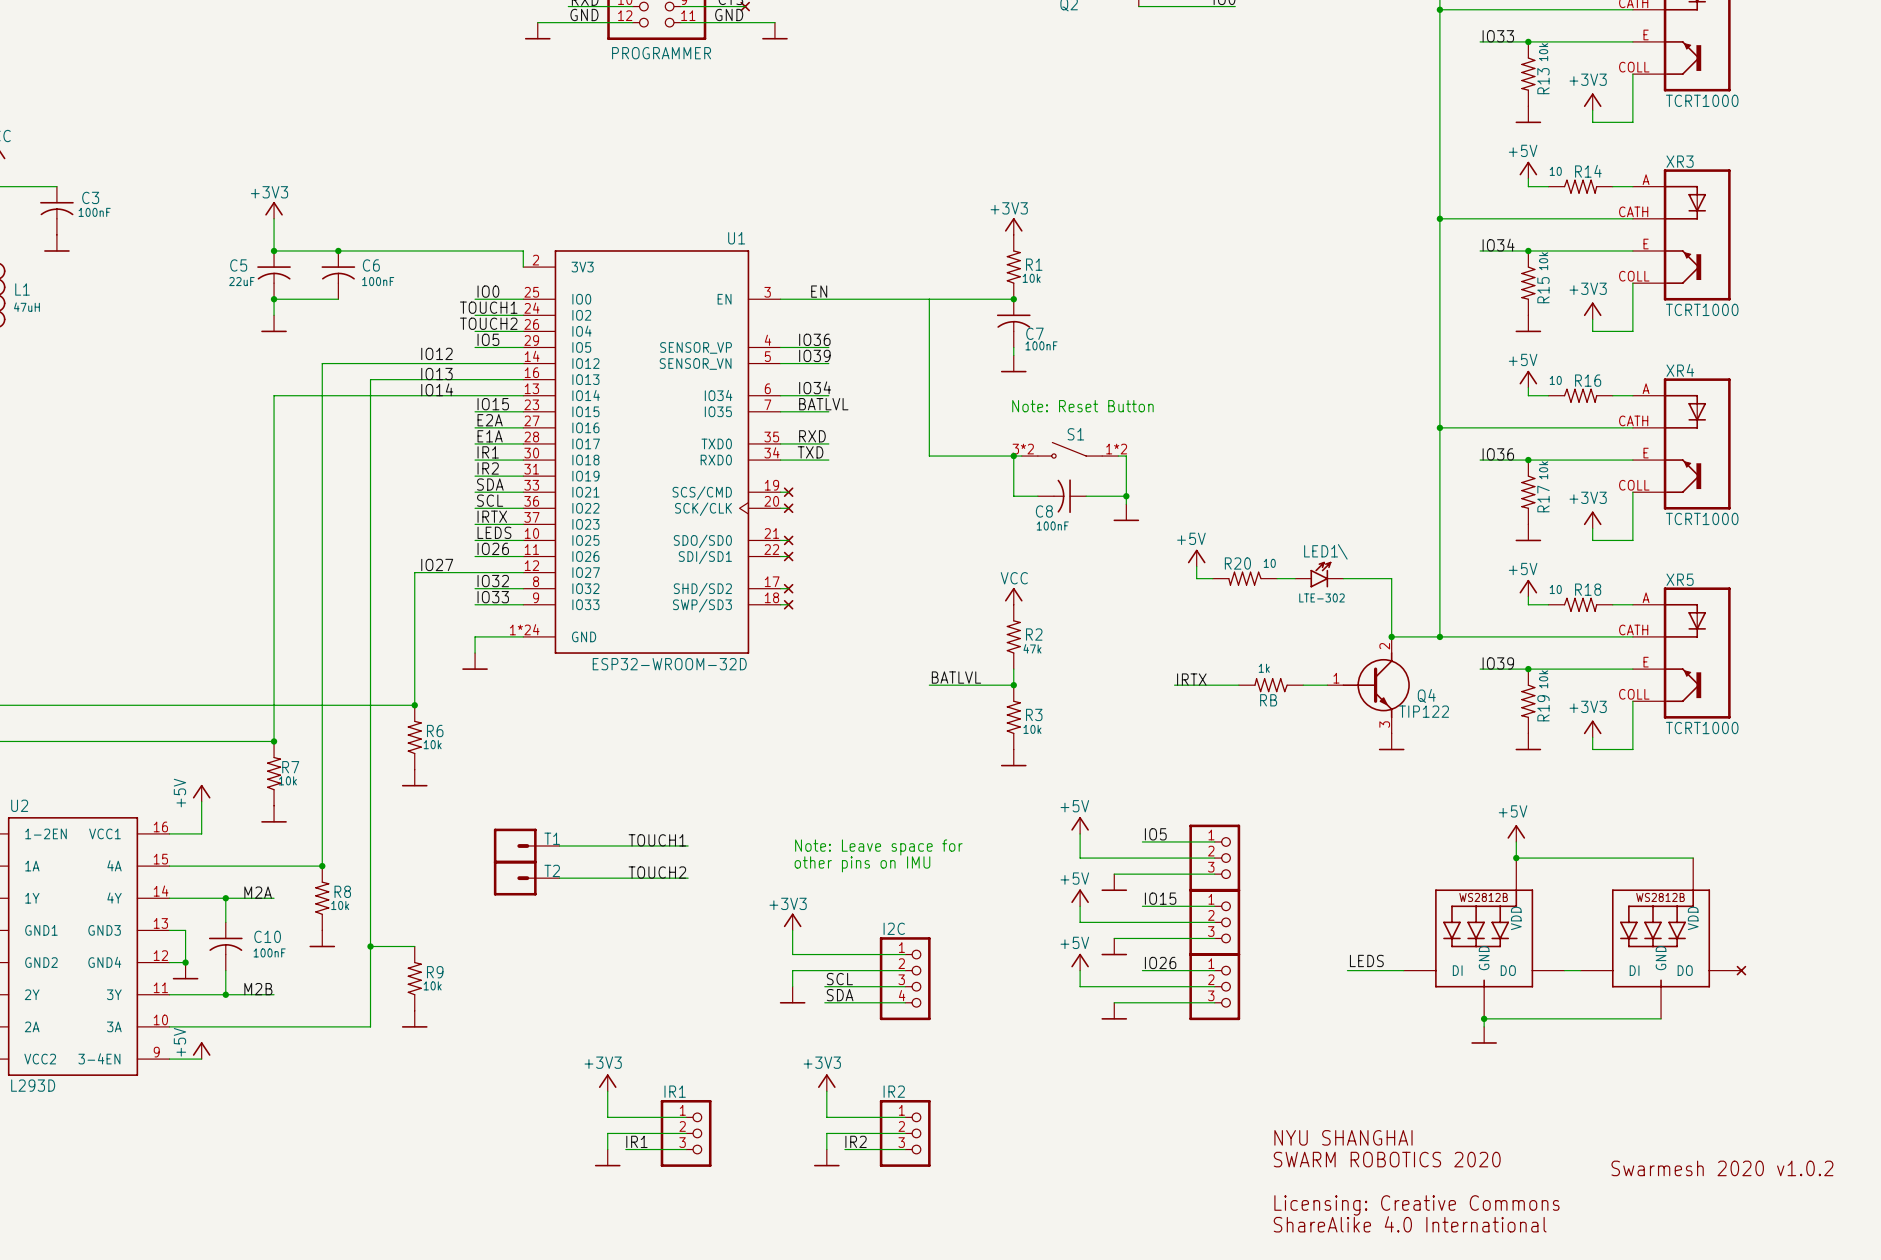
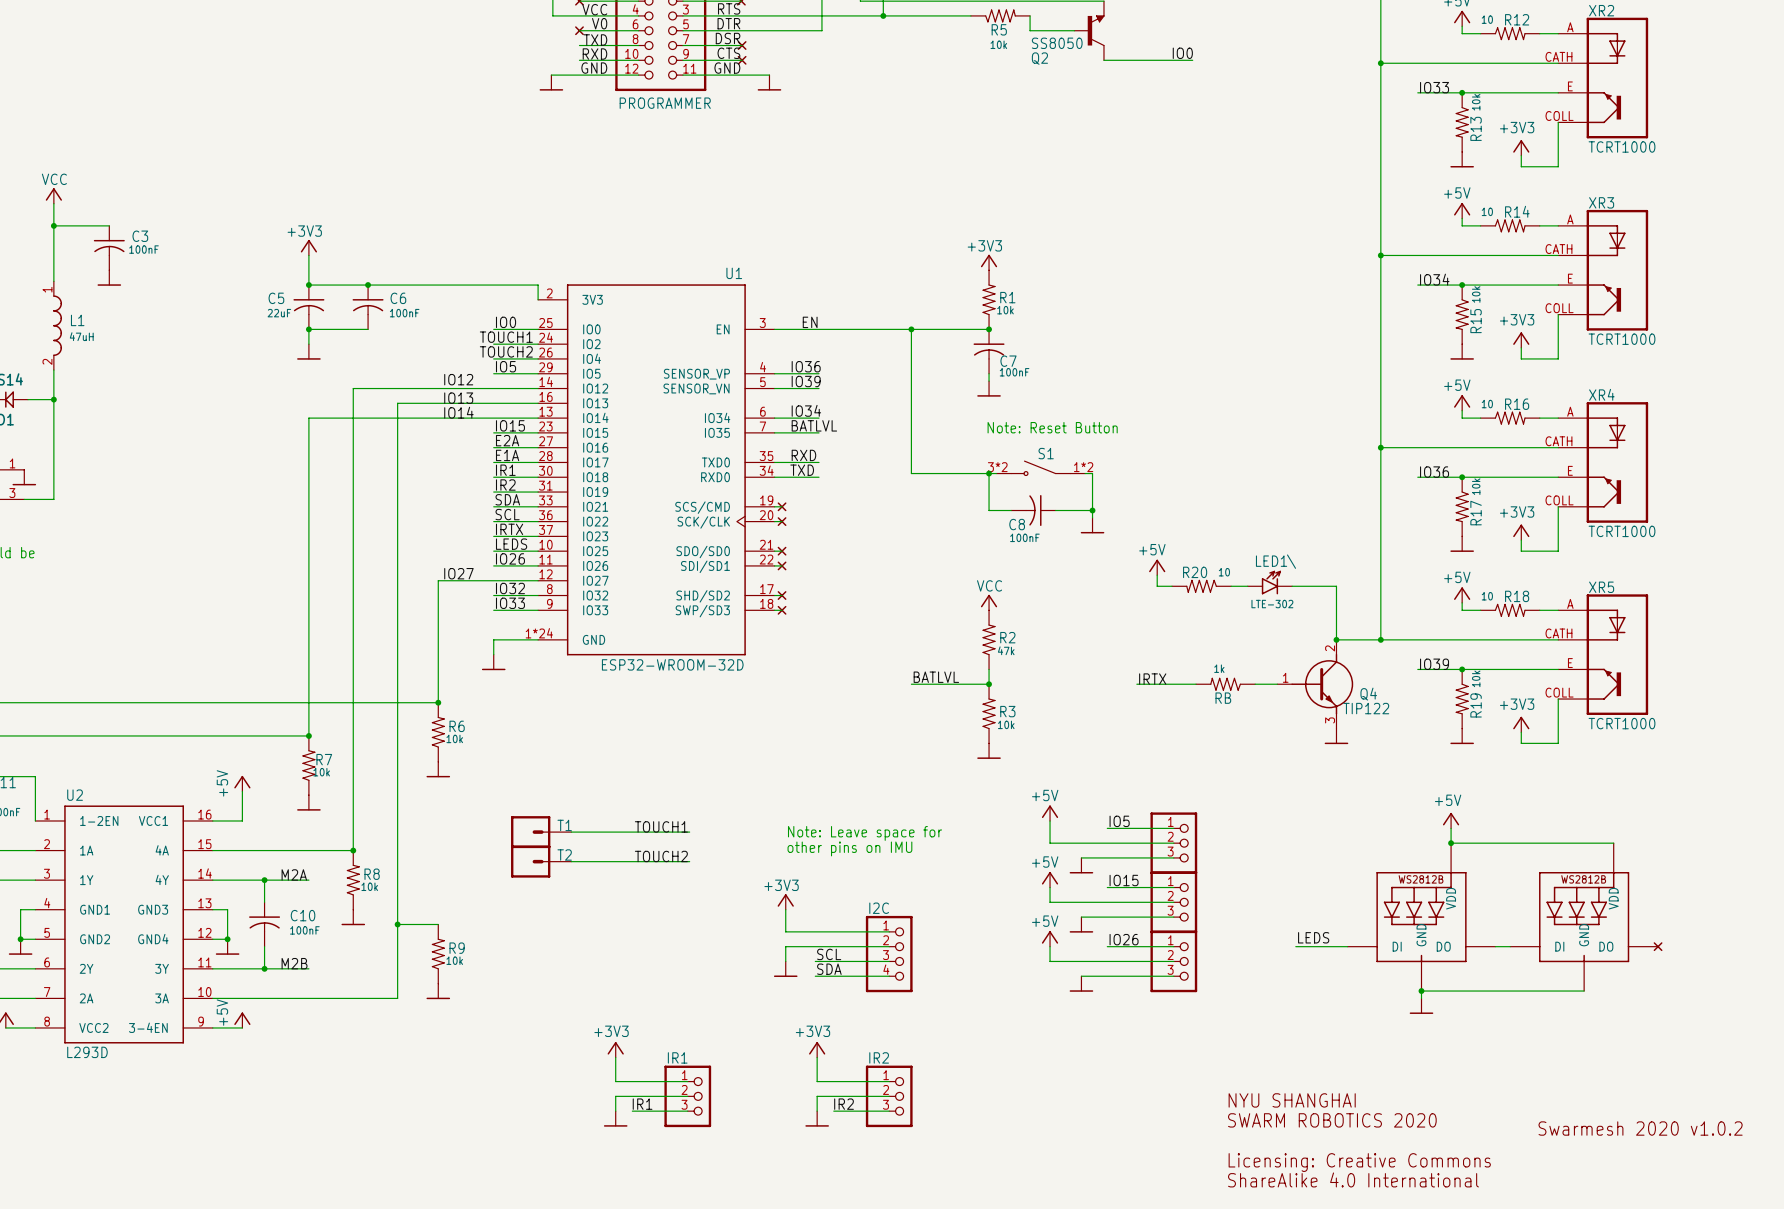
junction: none -> (911, 329)

